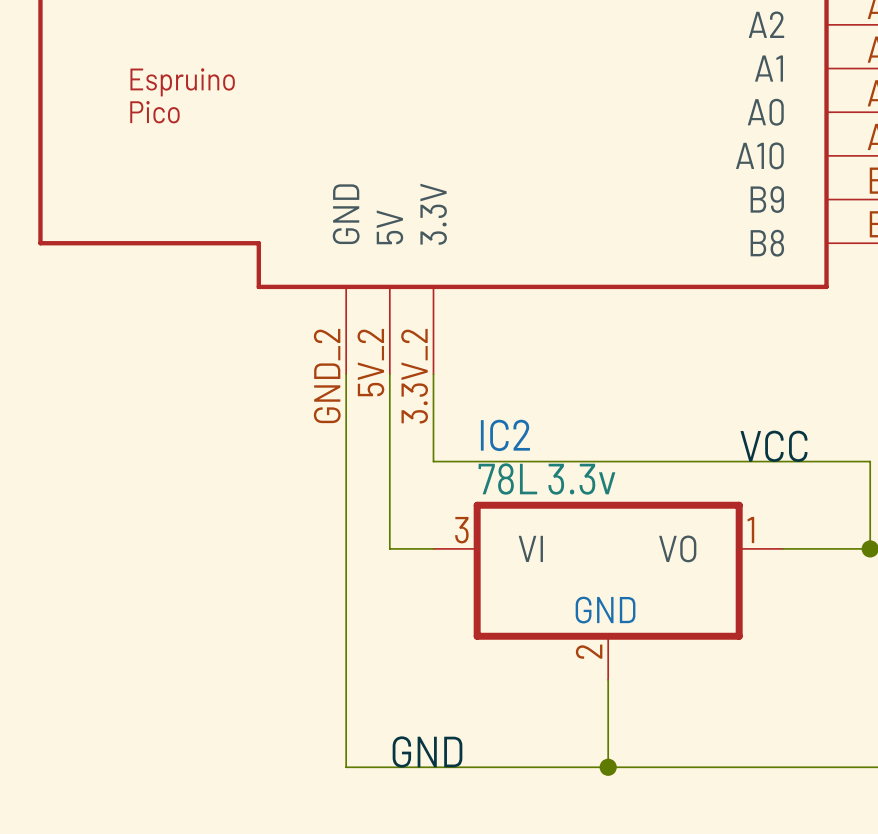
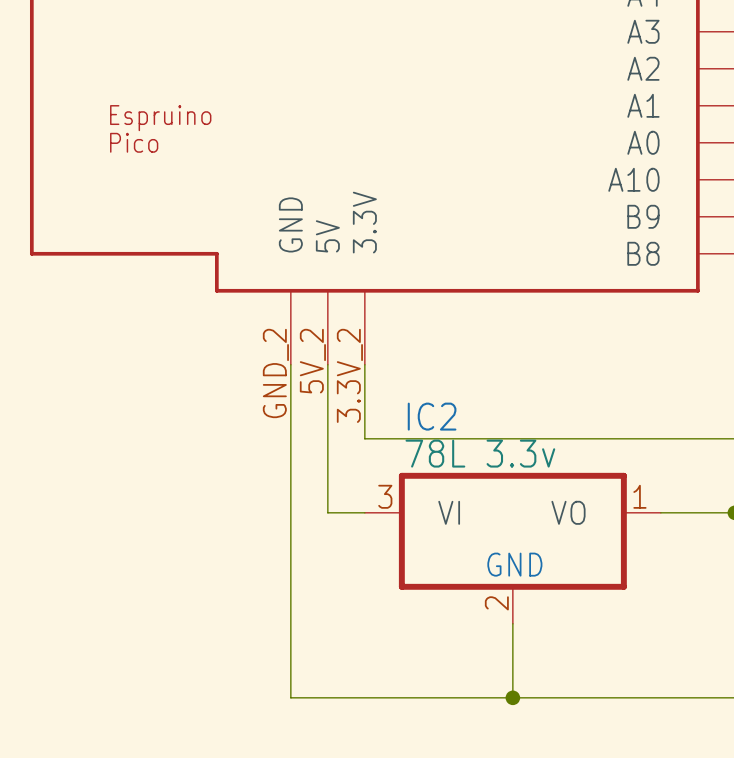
label: VCC (774, 446) -> none
label: GND (427, 751) -> none

